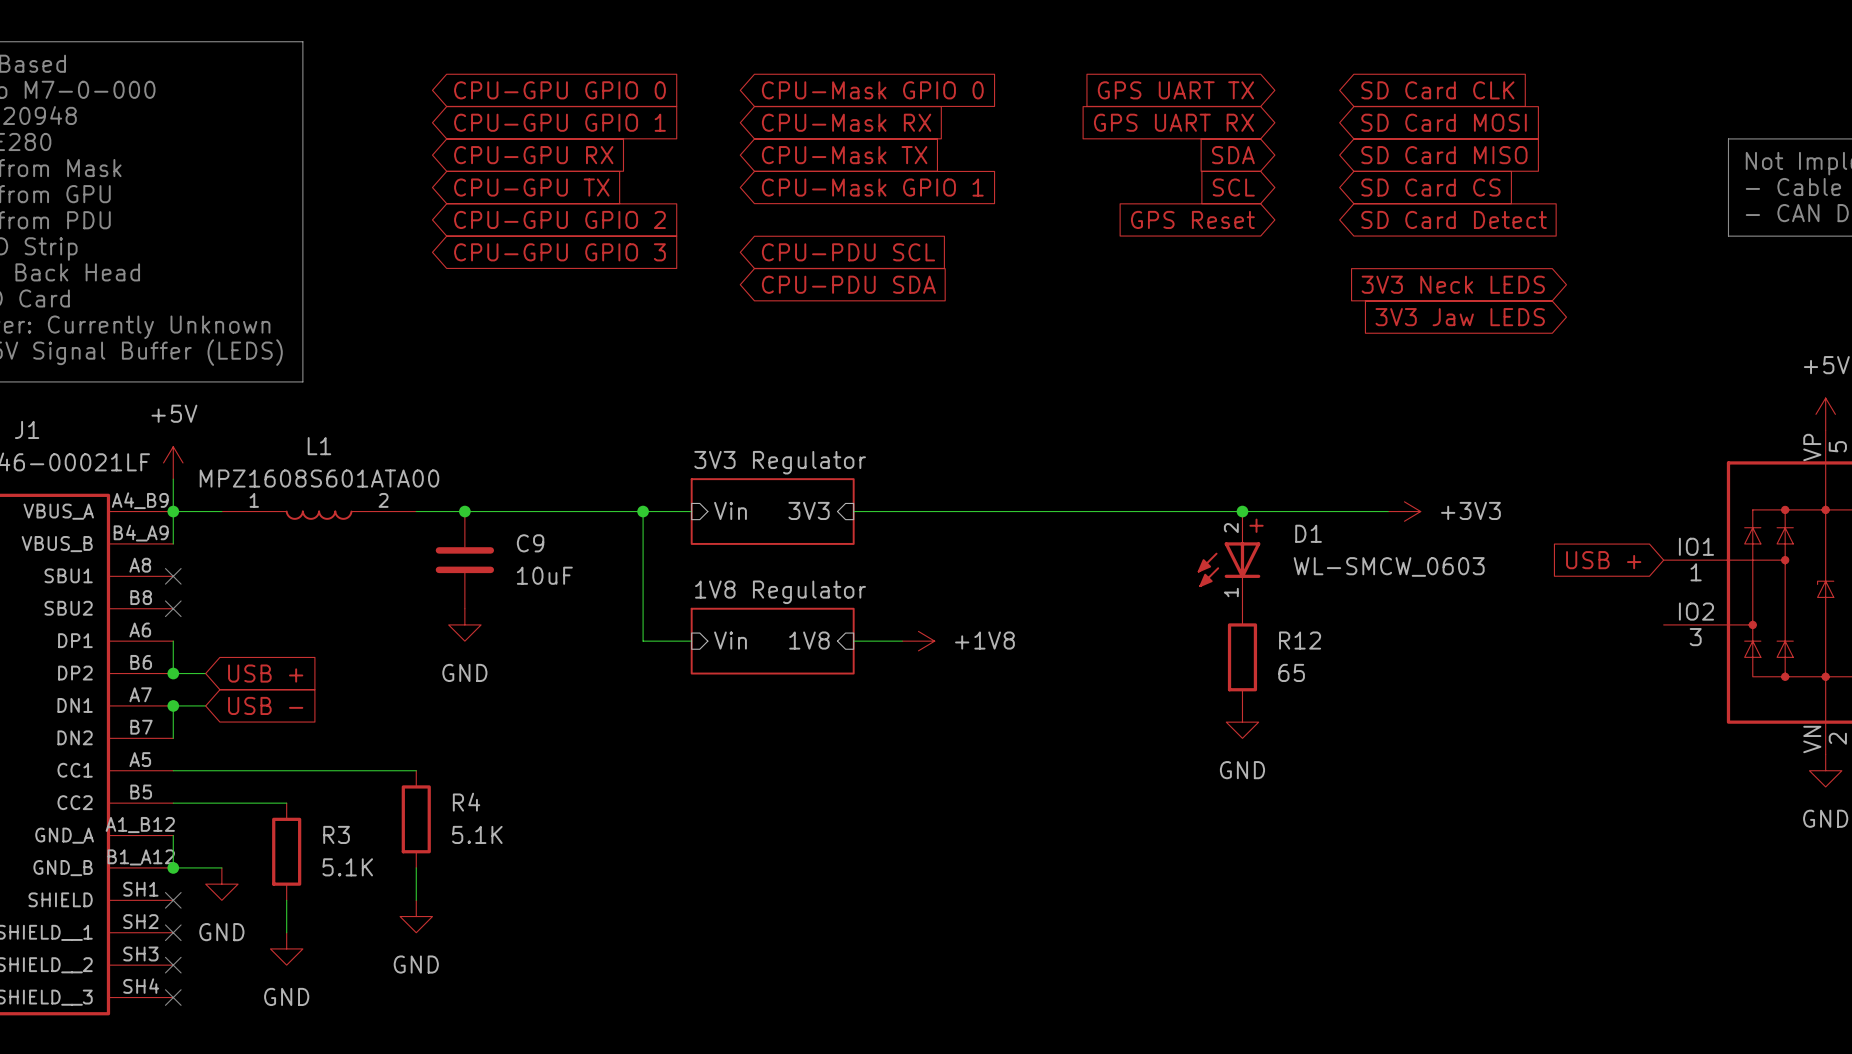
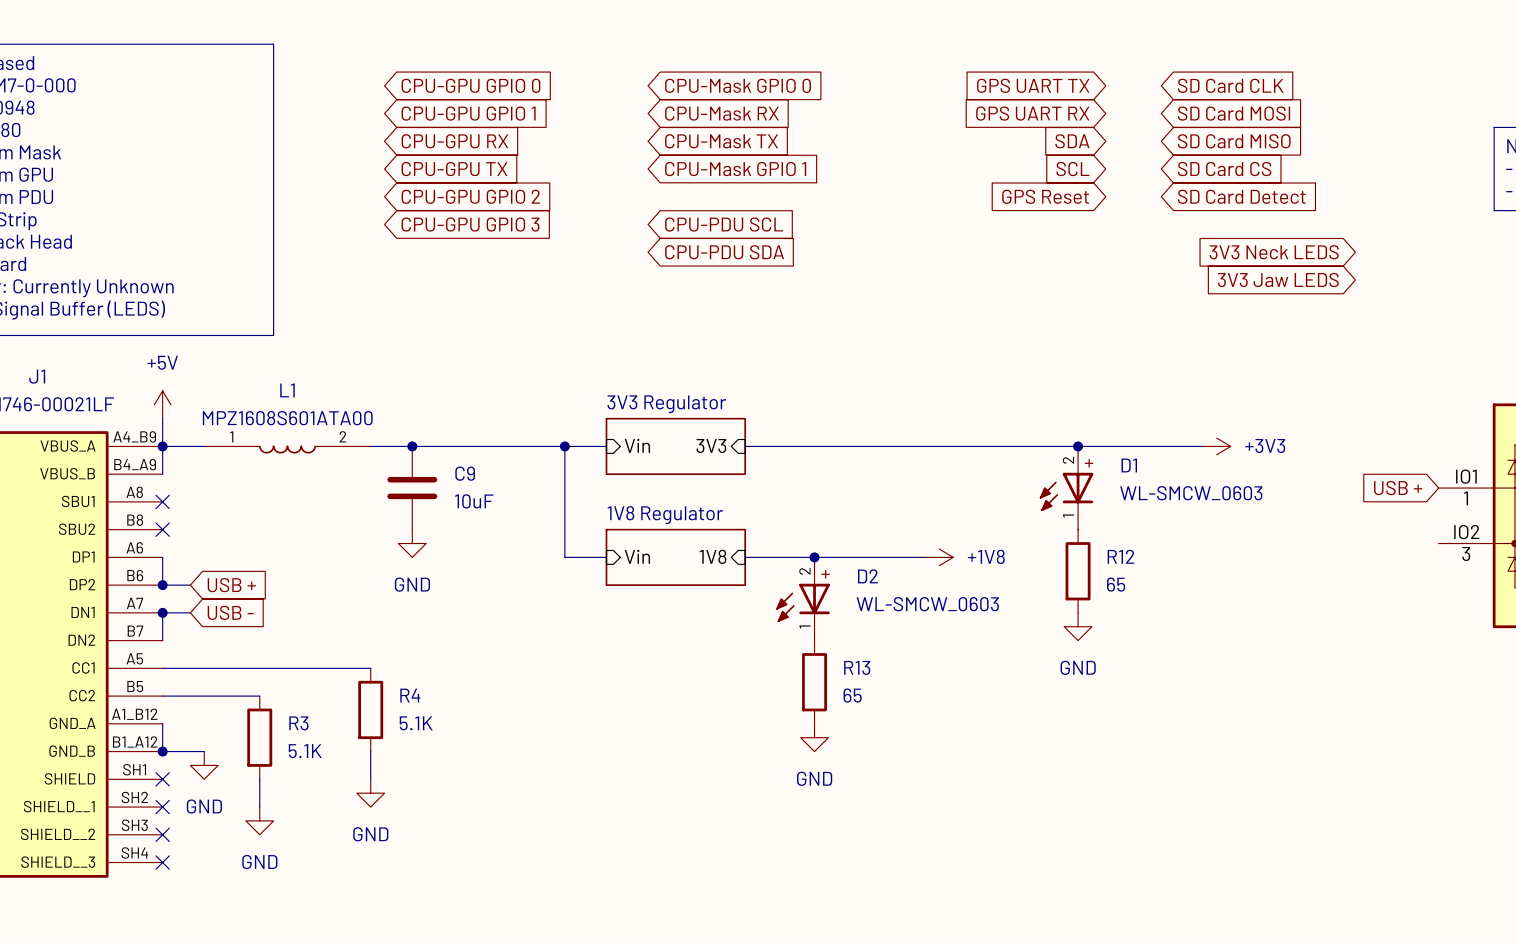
wire: none -> (786, 557) (925, 557)
power symbol position: +1V8 (918, 641) -> +1V8 (939, 557)
junction: none -> (814, 557)
D2: none -> WL-SMCW_0603 (803, 599)
R13: none -> 65 (814, 682)
power symbol: none -> GND (814, 737)

